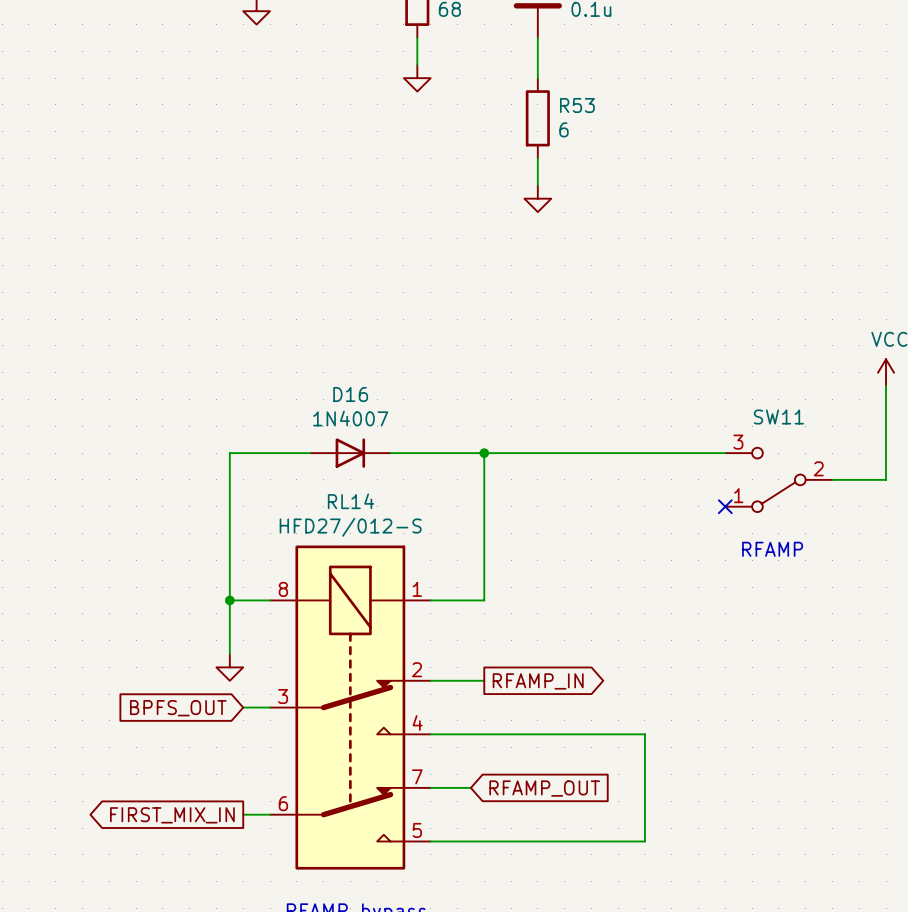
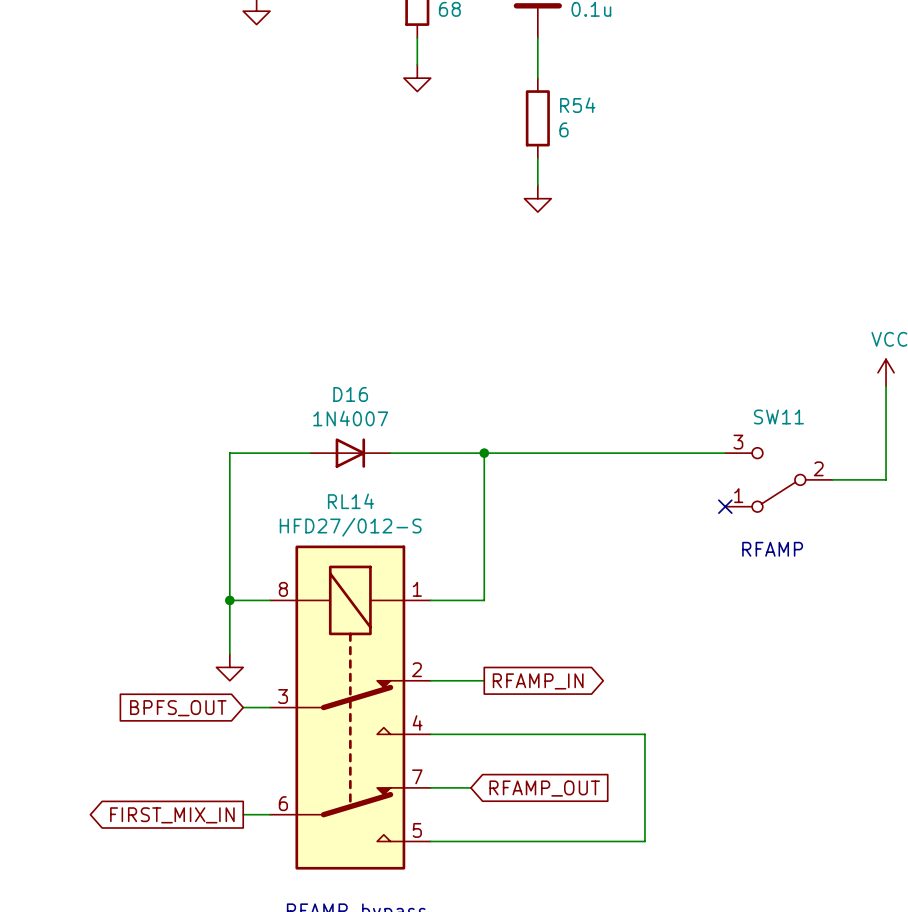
R53 name: R53 (577, 105) -> R54 (577, 105)

